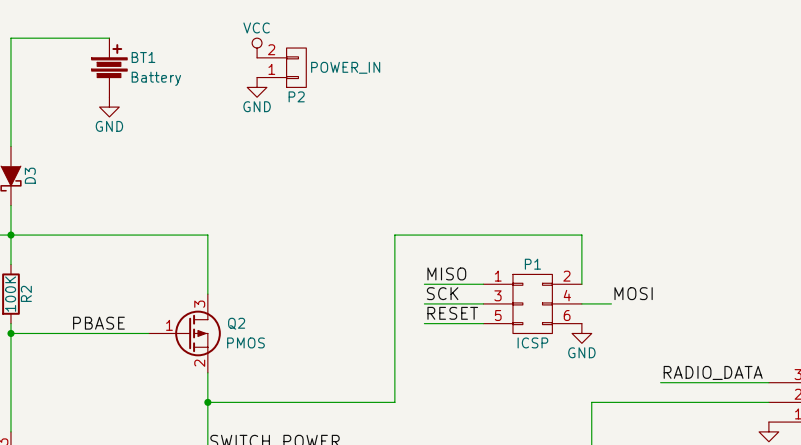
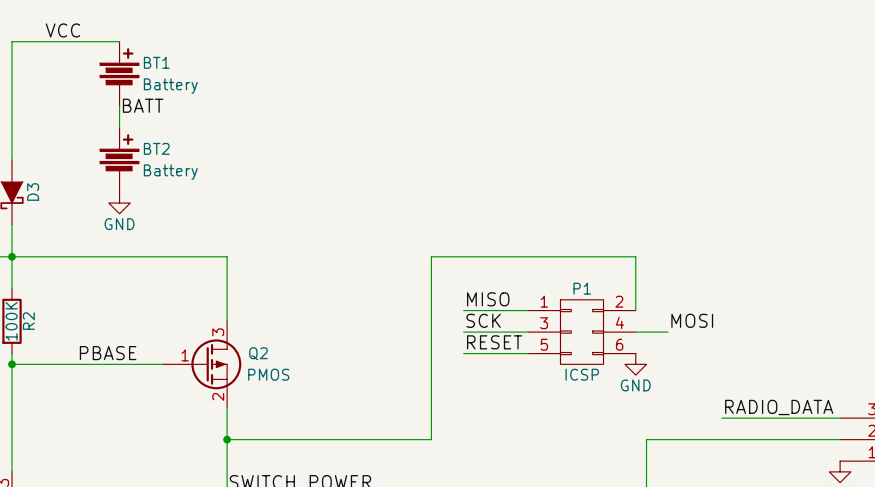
label: none -> VCC (62, 30)
power symbol: VCC (257, 48) -> none
P2: POWER_IN (281, 67) -> none
power symbol: GND (257, 87) -> none
label: none -> BATT (143, 105)
power symbol position: GND (109, 107) -> GND (119, 203)
BT2: none -> Battery (119, 160)

